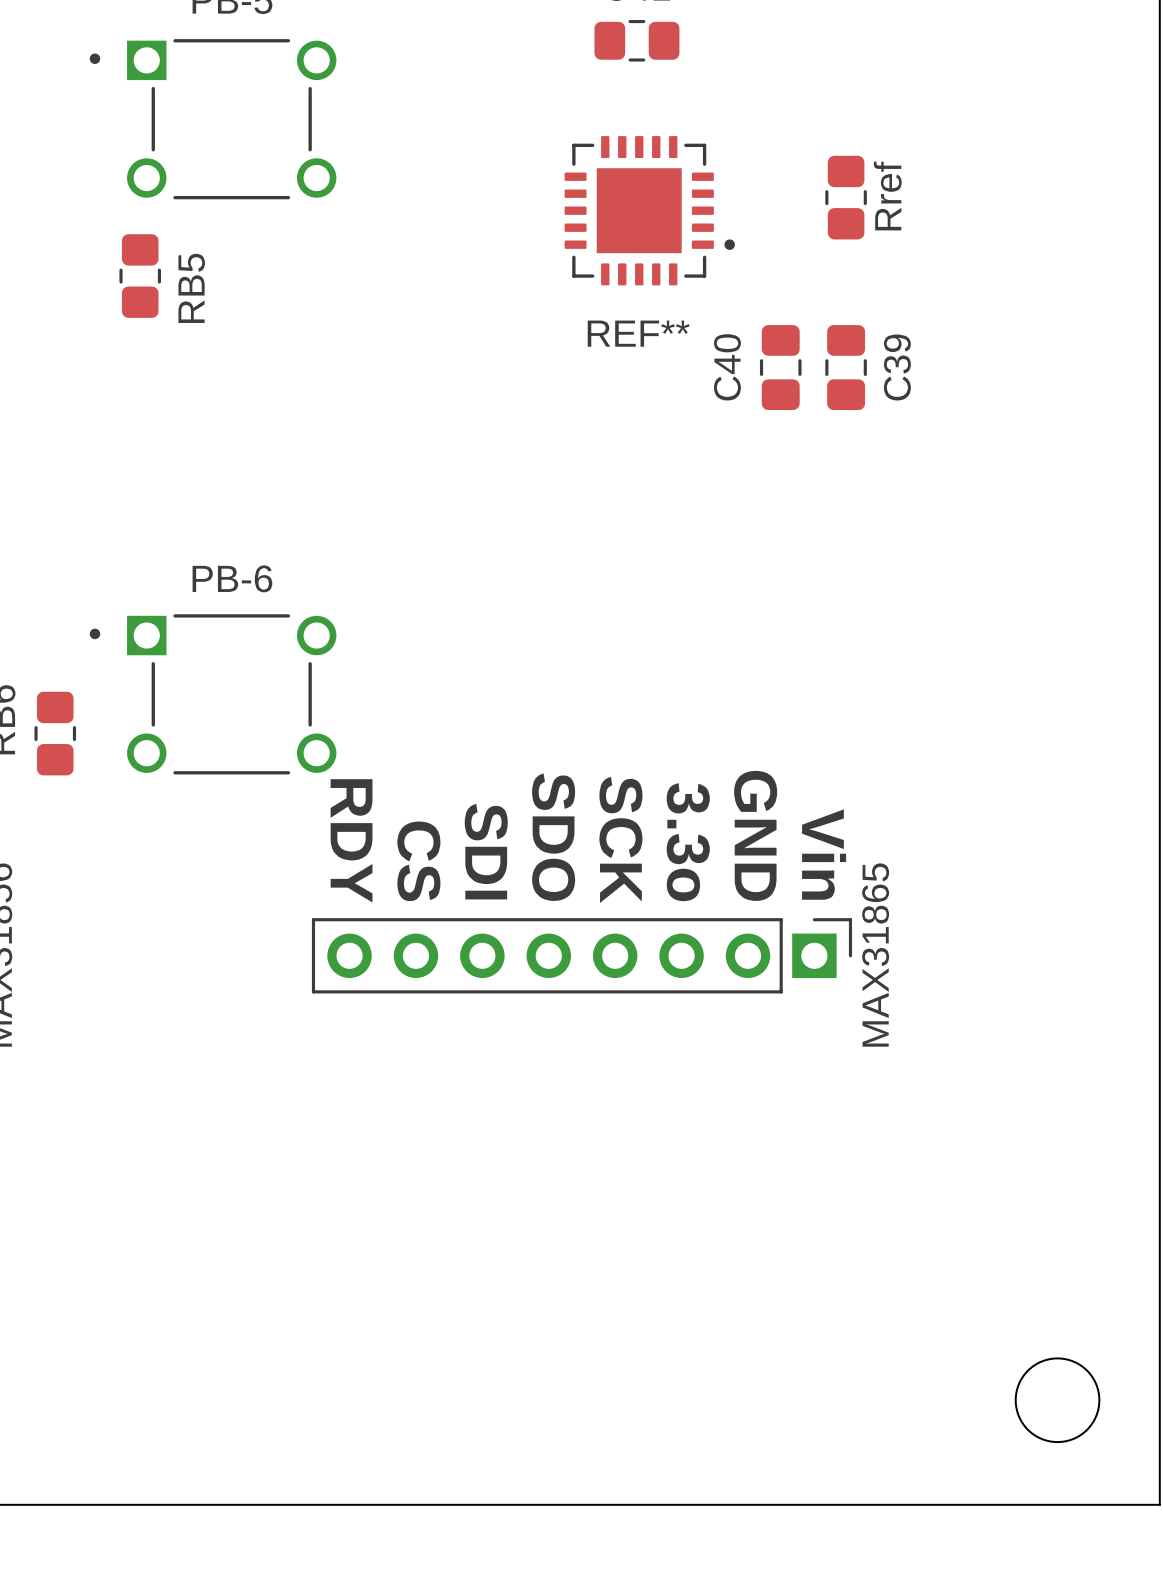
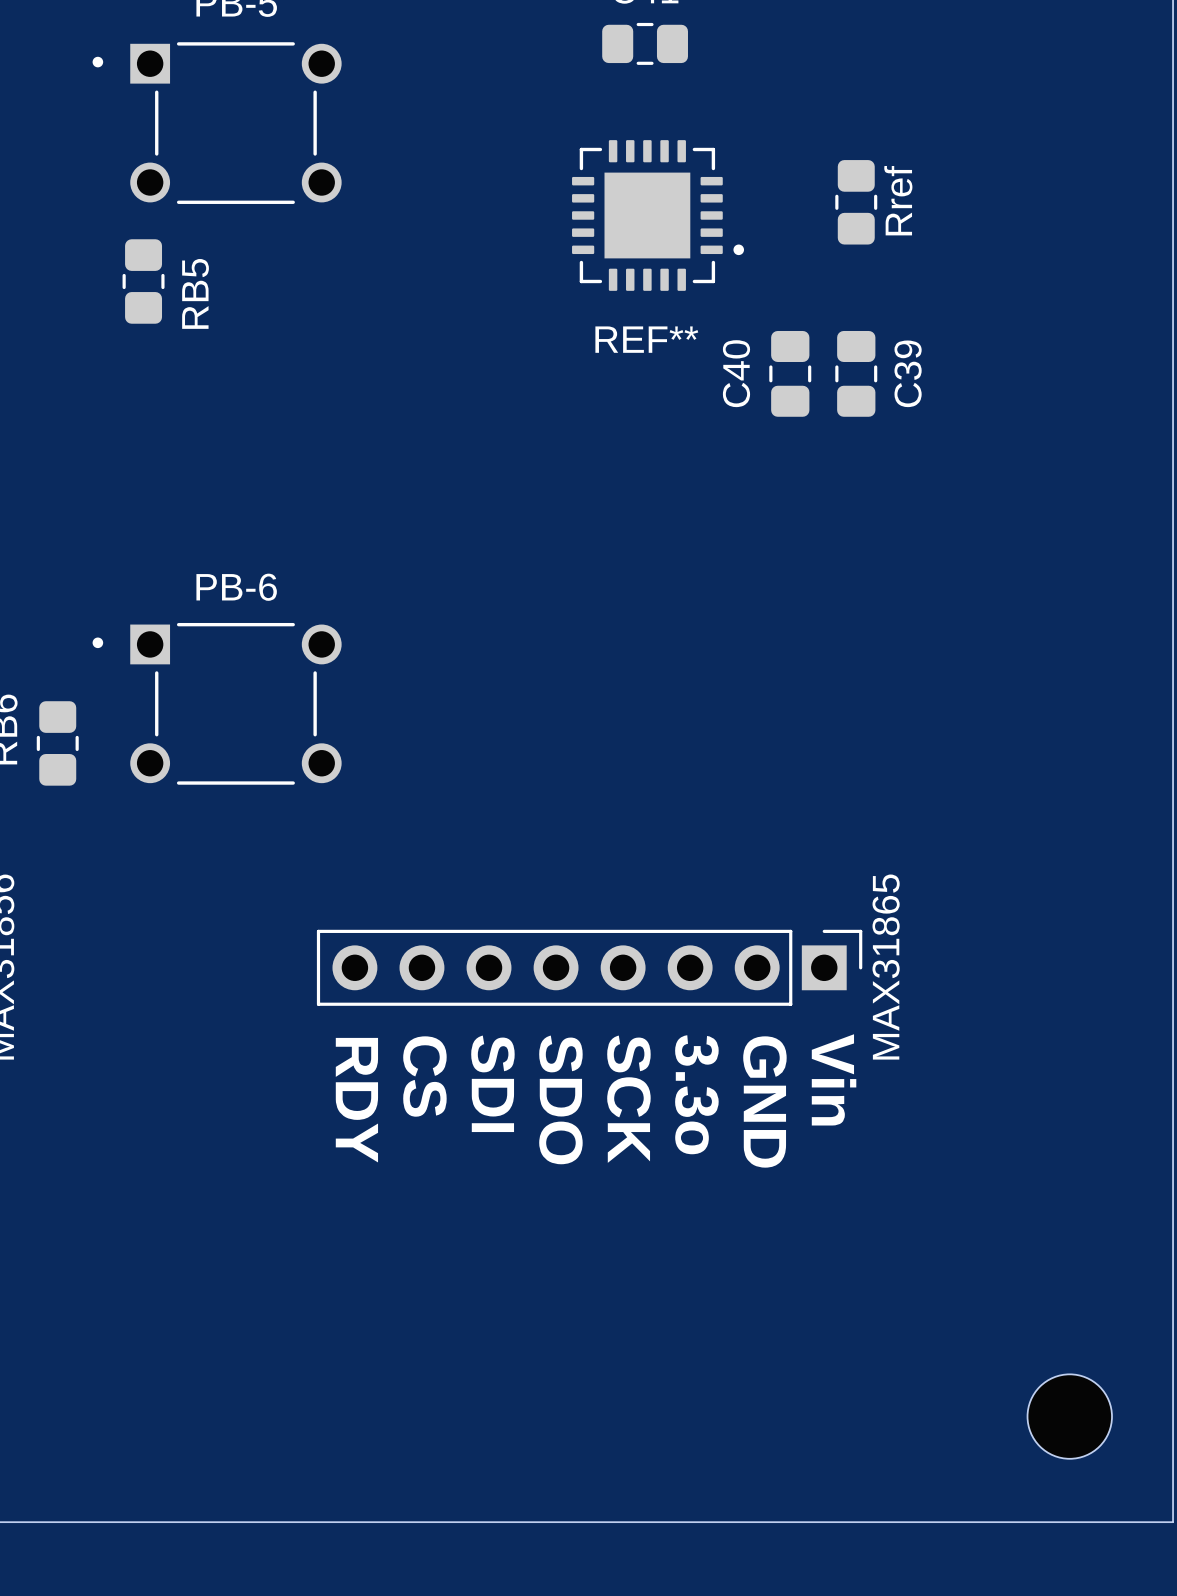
text position: GND (755, 835) -> GND (764, 1101)
text position: SDO (553, 837) -> SDO (560, 1099)
text position: SCK (620, 839) -> SCK (628, 1099)
text position: RDY (351, 840) -> RDY (356, 1100)
text position: 3.3o (688, 842) -> 3.3o (696, 1094)
text position: SDI (486, 851) -> SDI (492, 1083)
text position: Vin (824, 854) -> Vin (834, 1079)
text position: CS (418, 861) -> CS (424, 1076)

